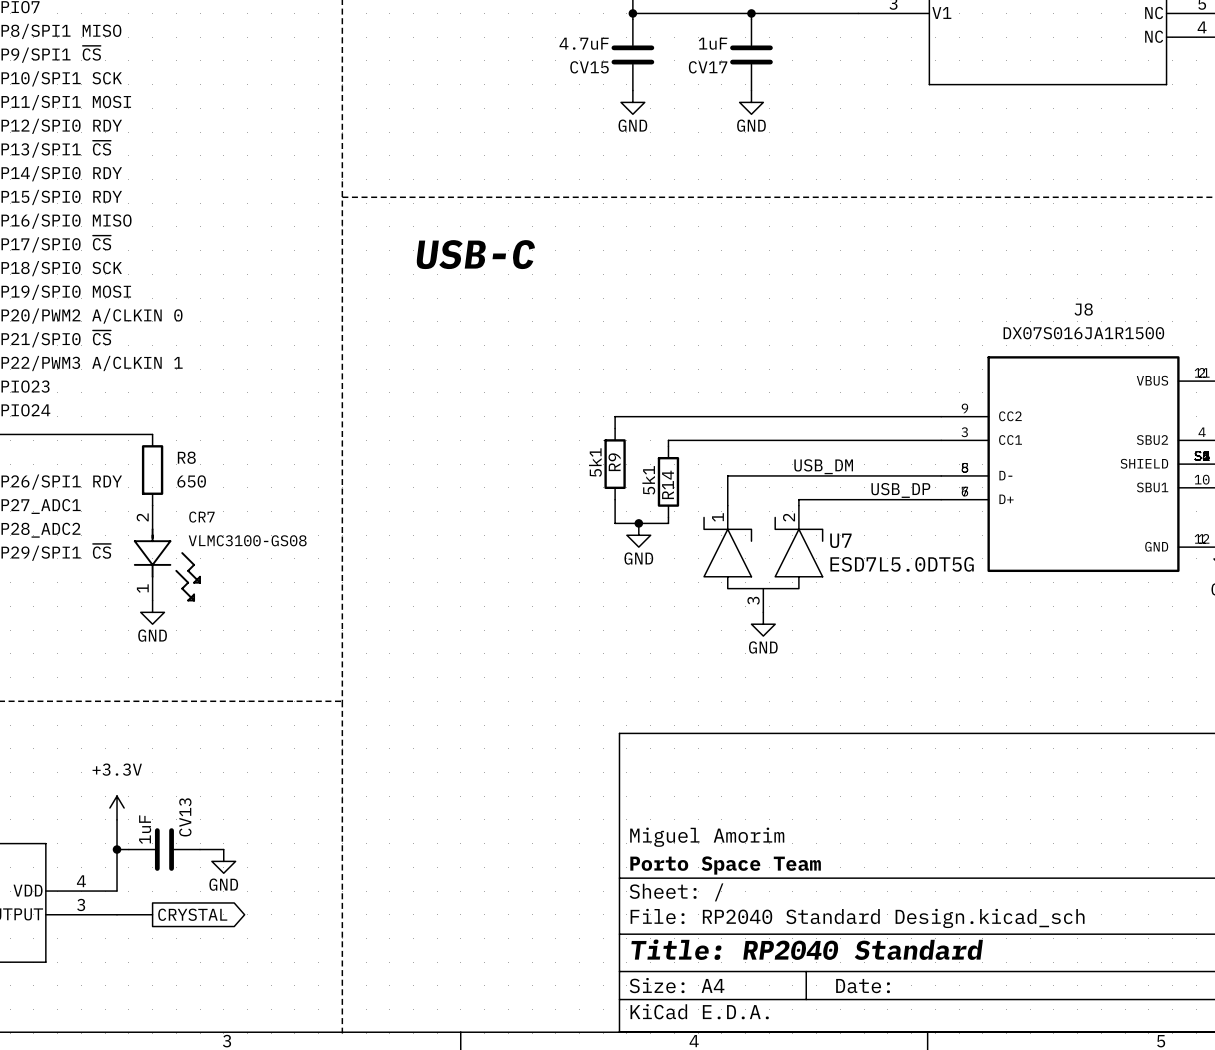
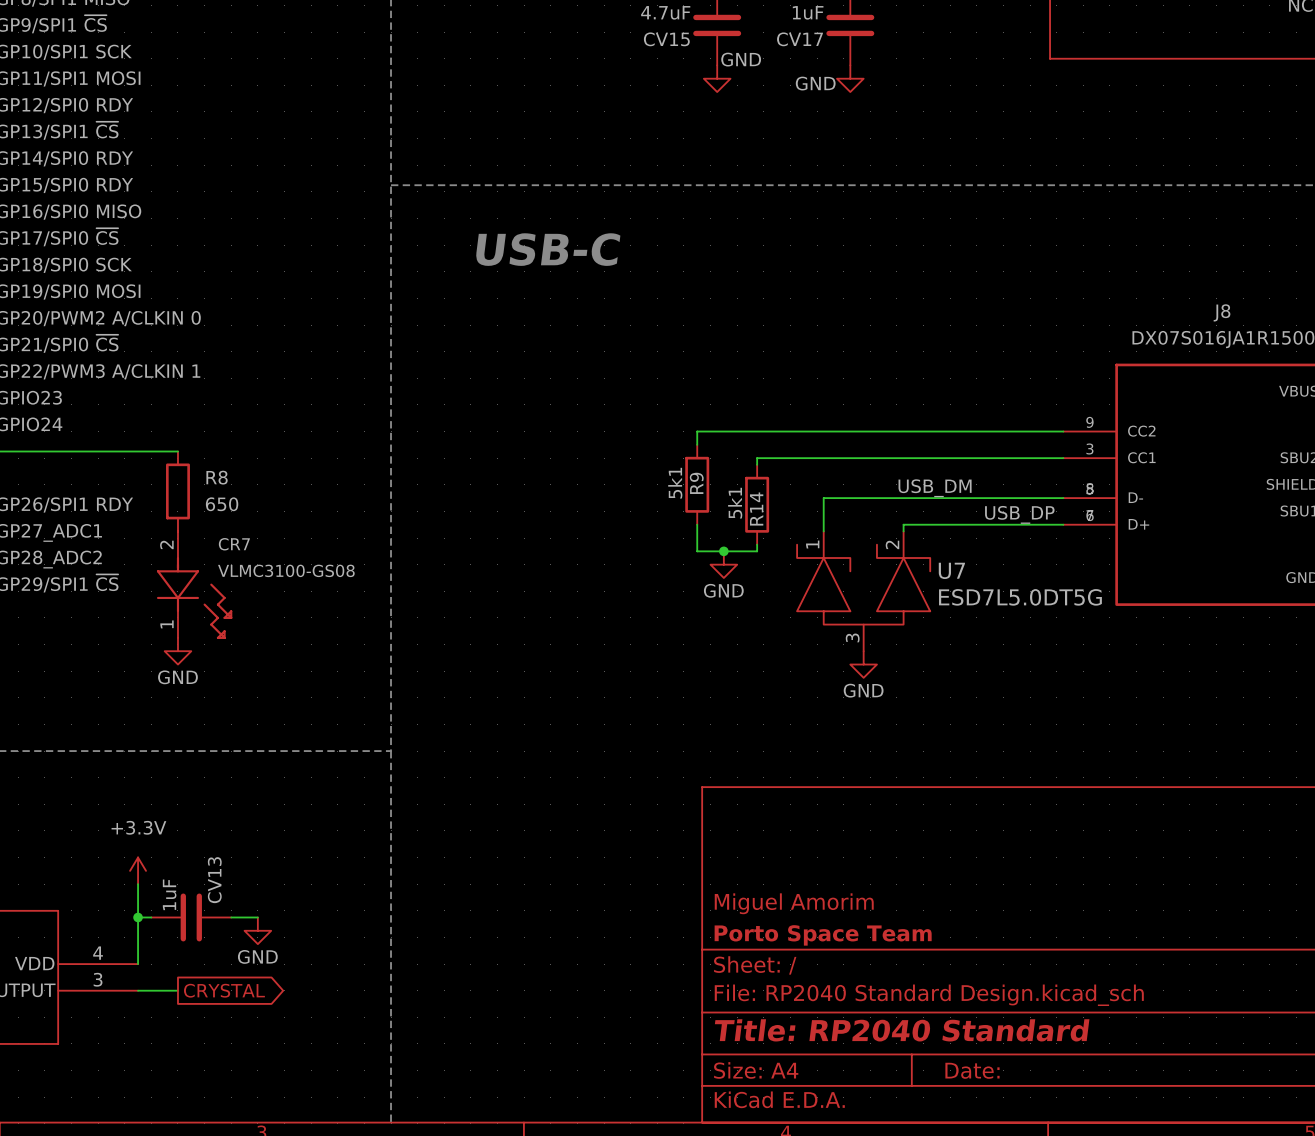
power symbol text position: GND (632, 125) -> GND (741, 59)
power symbol text position: GND (751, 125) -> GND (815, 83)

